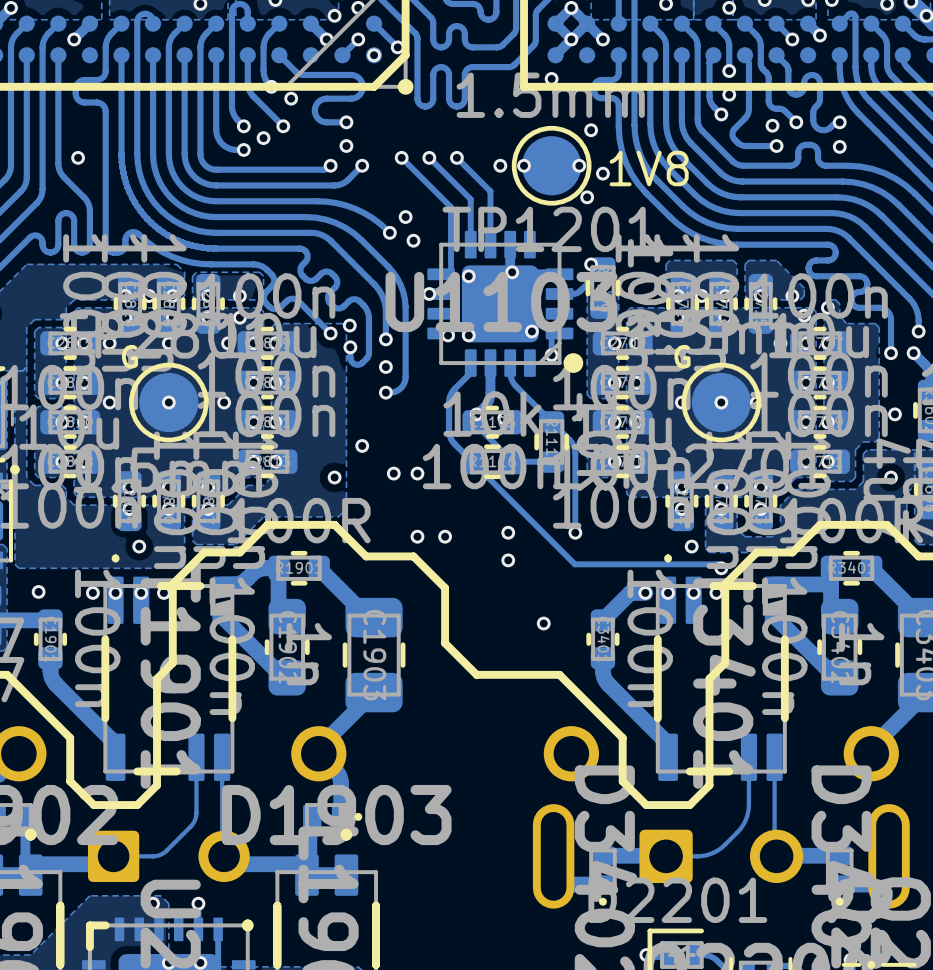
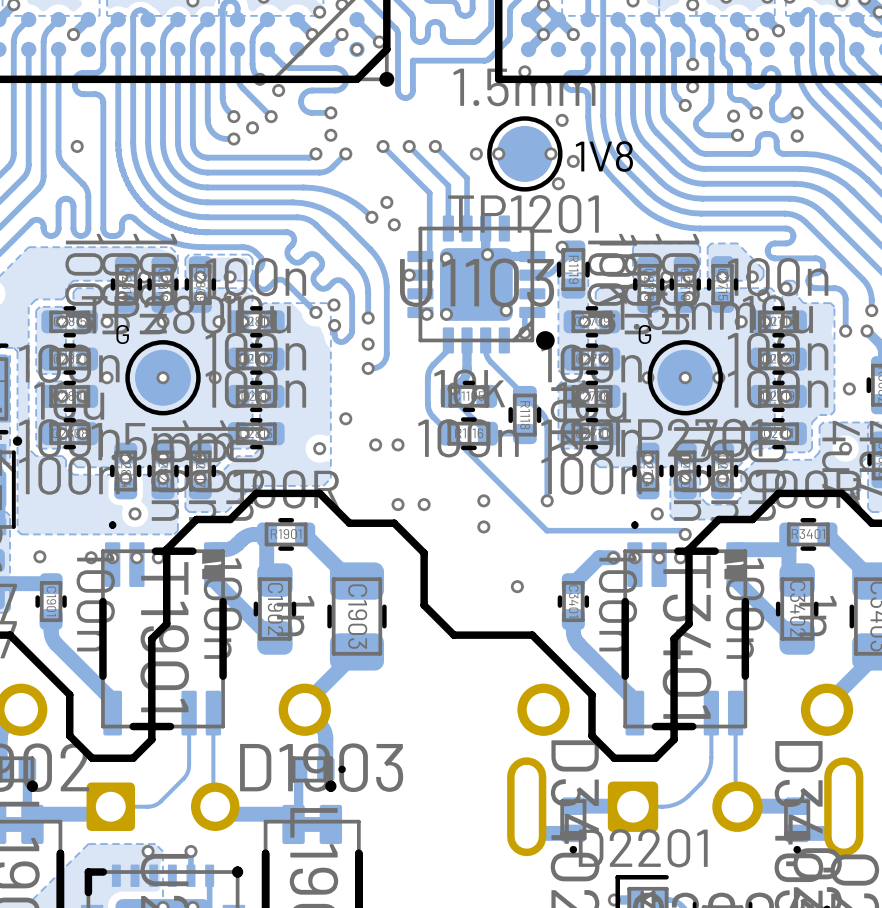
track: (472, 67) (465, 71) (464, 99) (458, 106) (452, 105) (449, 100) (447, 70) (439, 67) (434, 70) (433, 74) -> (450, 60) (412, 60) (412, 68)

